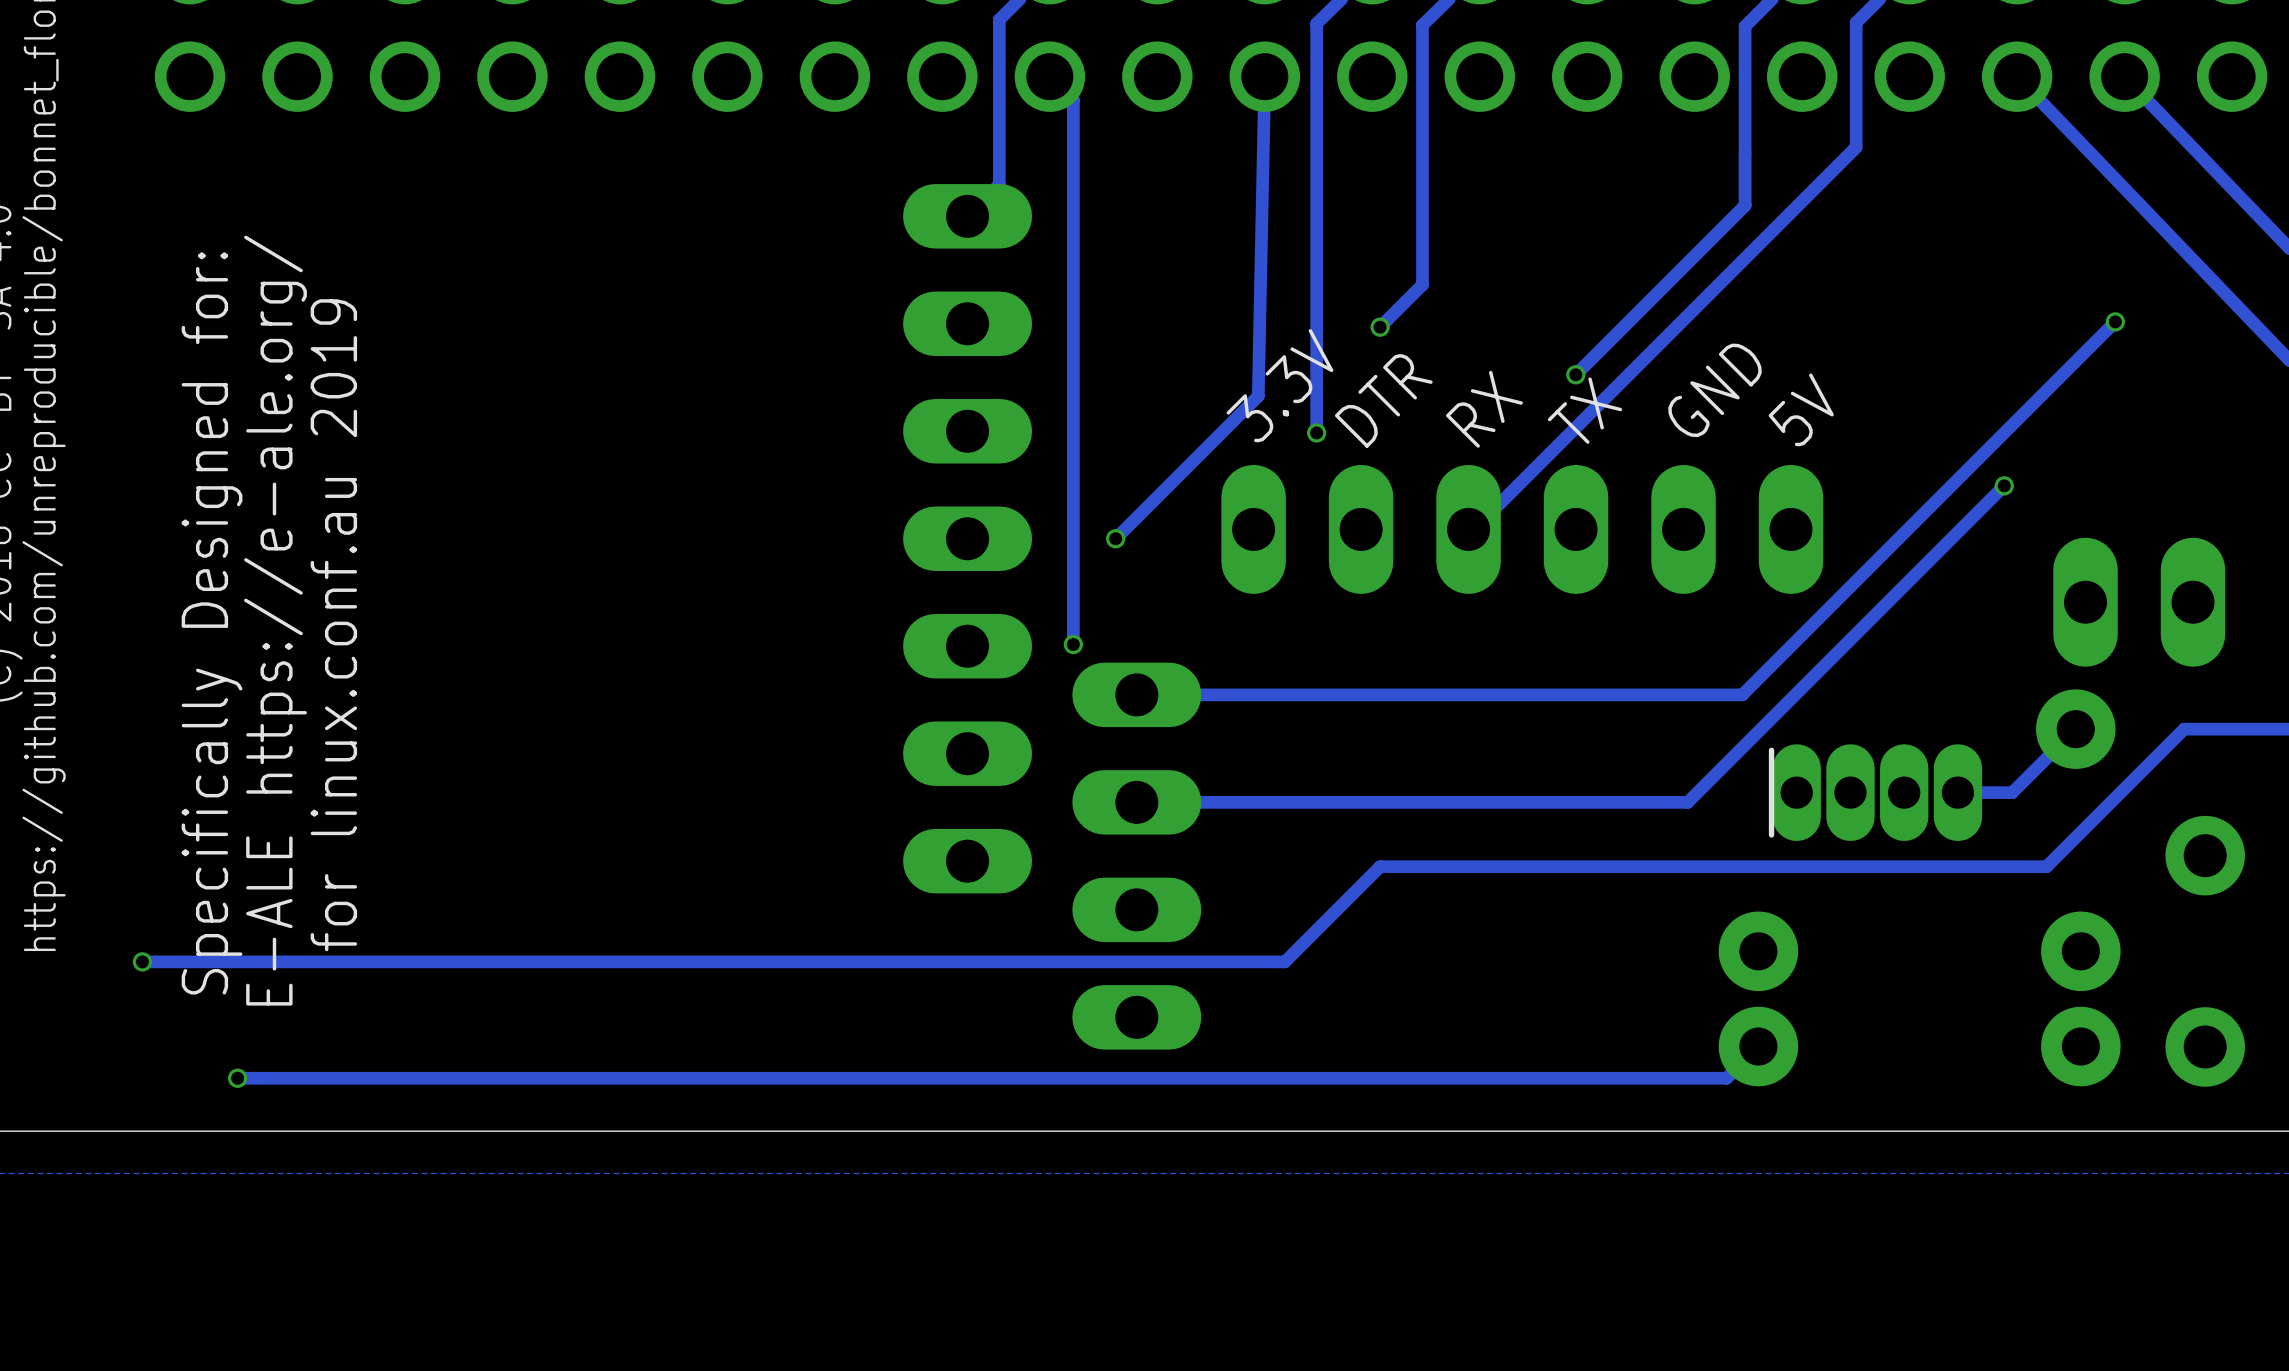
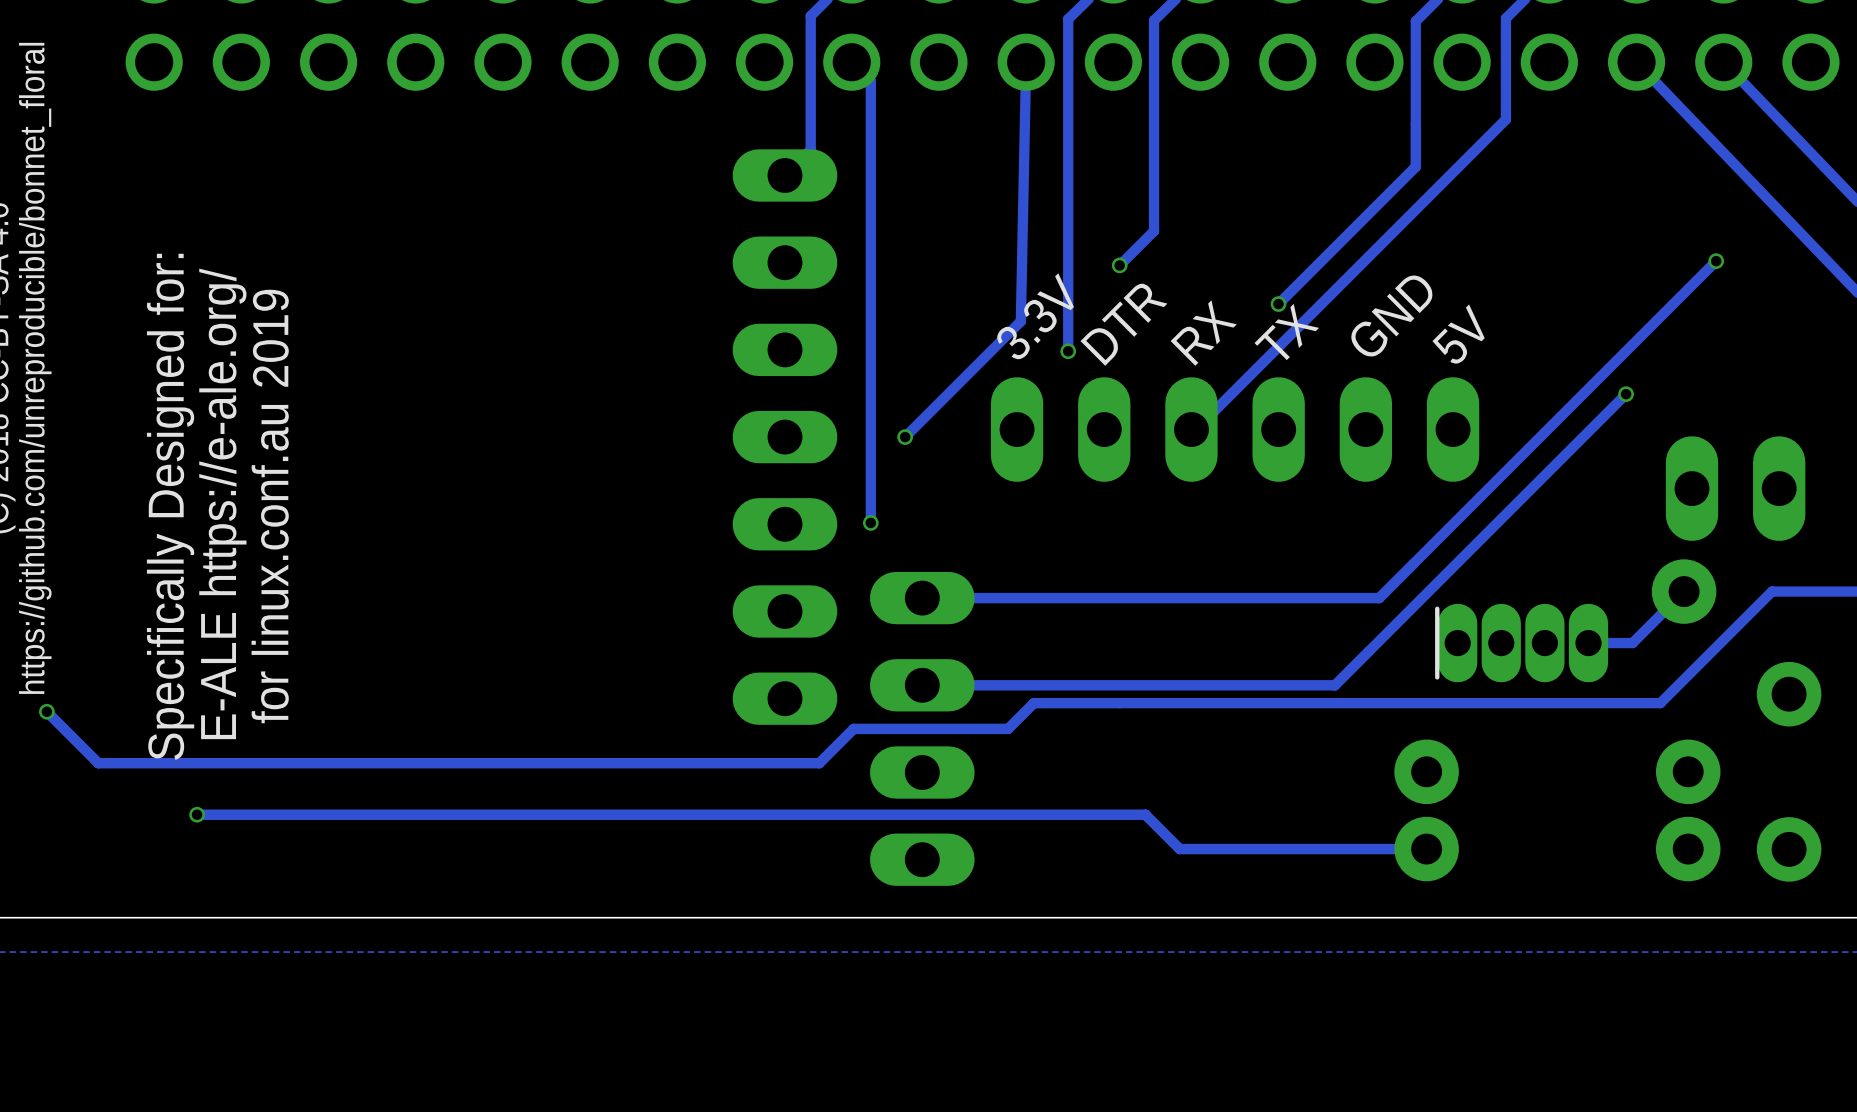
track: (1742, 694) (1136, 694) -> (1413, 563) (1379, 598) (922, 598)
track: (1687, 802) (1136, 802) -> (1369, 650) (1334, 685) (922, 685)
part position: (1136, 856) -> (922, 728)
track: (1380, 866) (1284, 961) (142, 961) -> (1119, 703) (1033, 703) (1008, 728) (853, 728) (819, 763) (98, 763) (46, 711)
via: none -> (46, 711)
via: (142, 961) -> none
via: none -> (197, 814)
track: (1758, 1046) (1726, 1078) (237, 1078) -> (1426, 849) (1179, 849) (1145, 814) (197, 814)
via: (237, 1078) -> none

